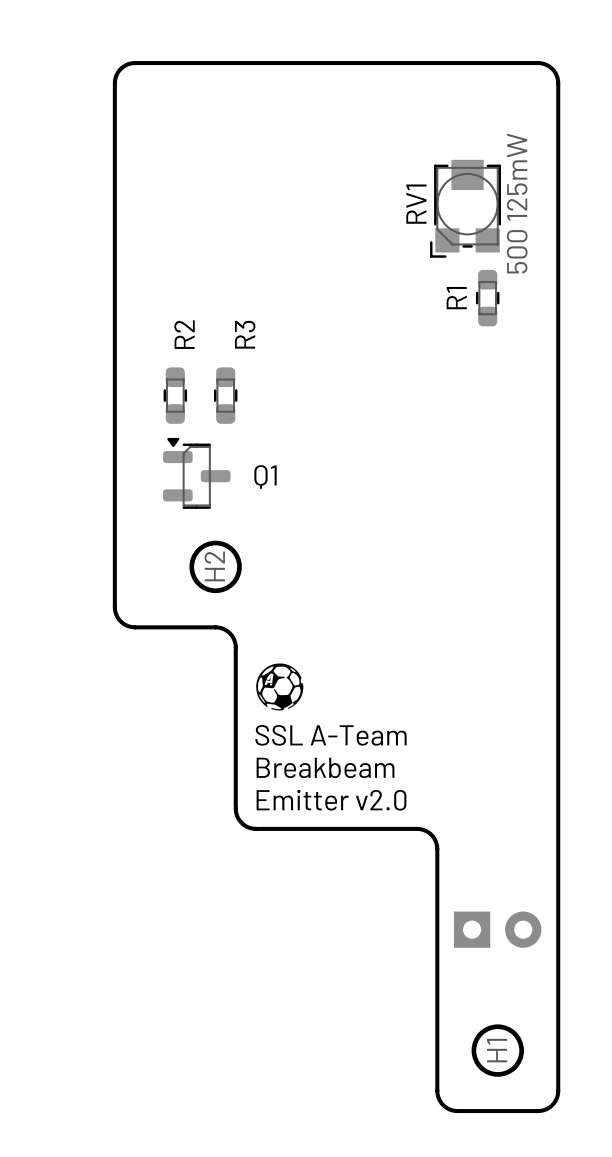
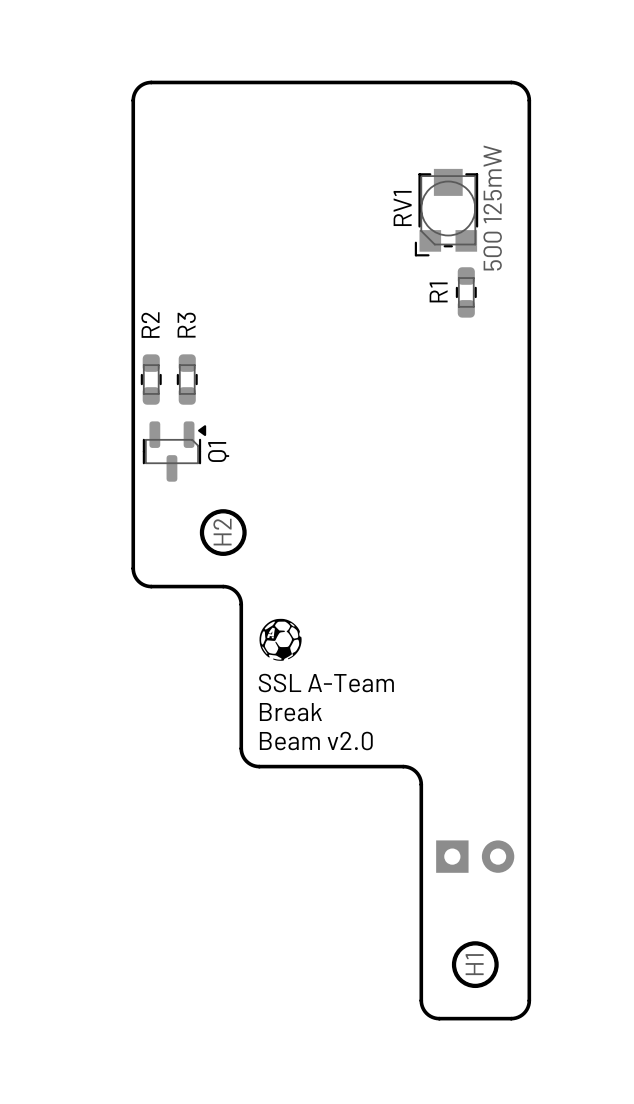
R2 name: R2 (184, 334) -> R3 (186, 325)
R2: none -> (151, 379)
R3: (225, 395) -> none
Q1 rotation: 0° (196, 473) -> 90° clockwise (174, 451)
text: Breakbeam (325, 767) -> Break (290, 712)
text: Emitter v2.0 (331, 800) -> Beam v2.0 (316, 741)

